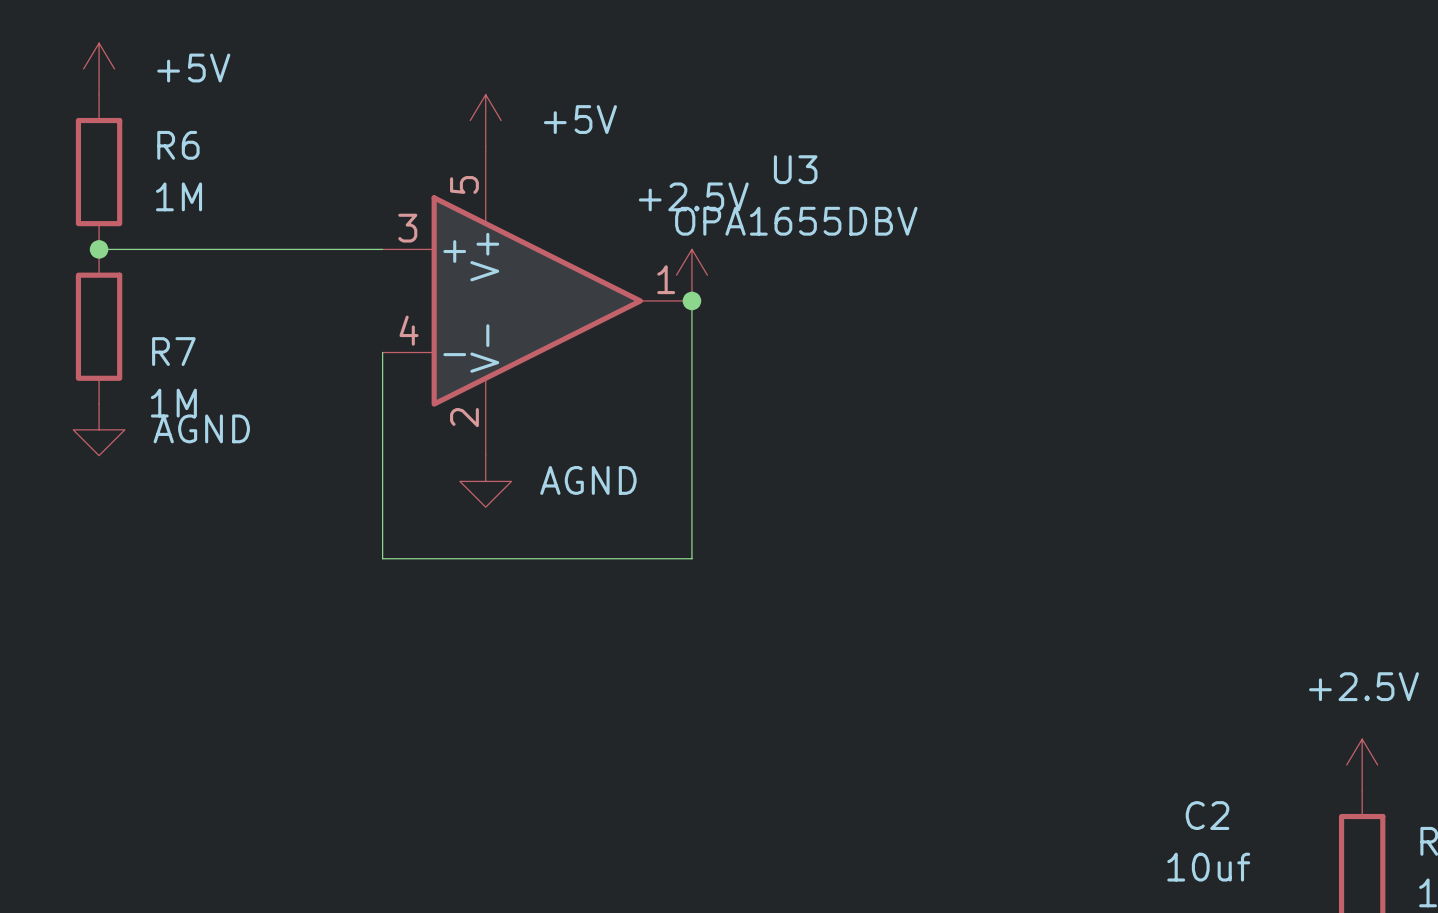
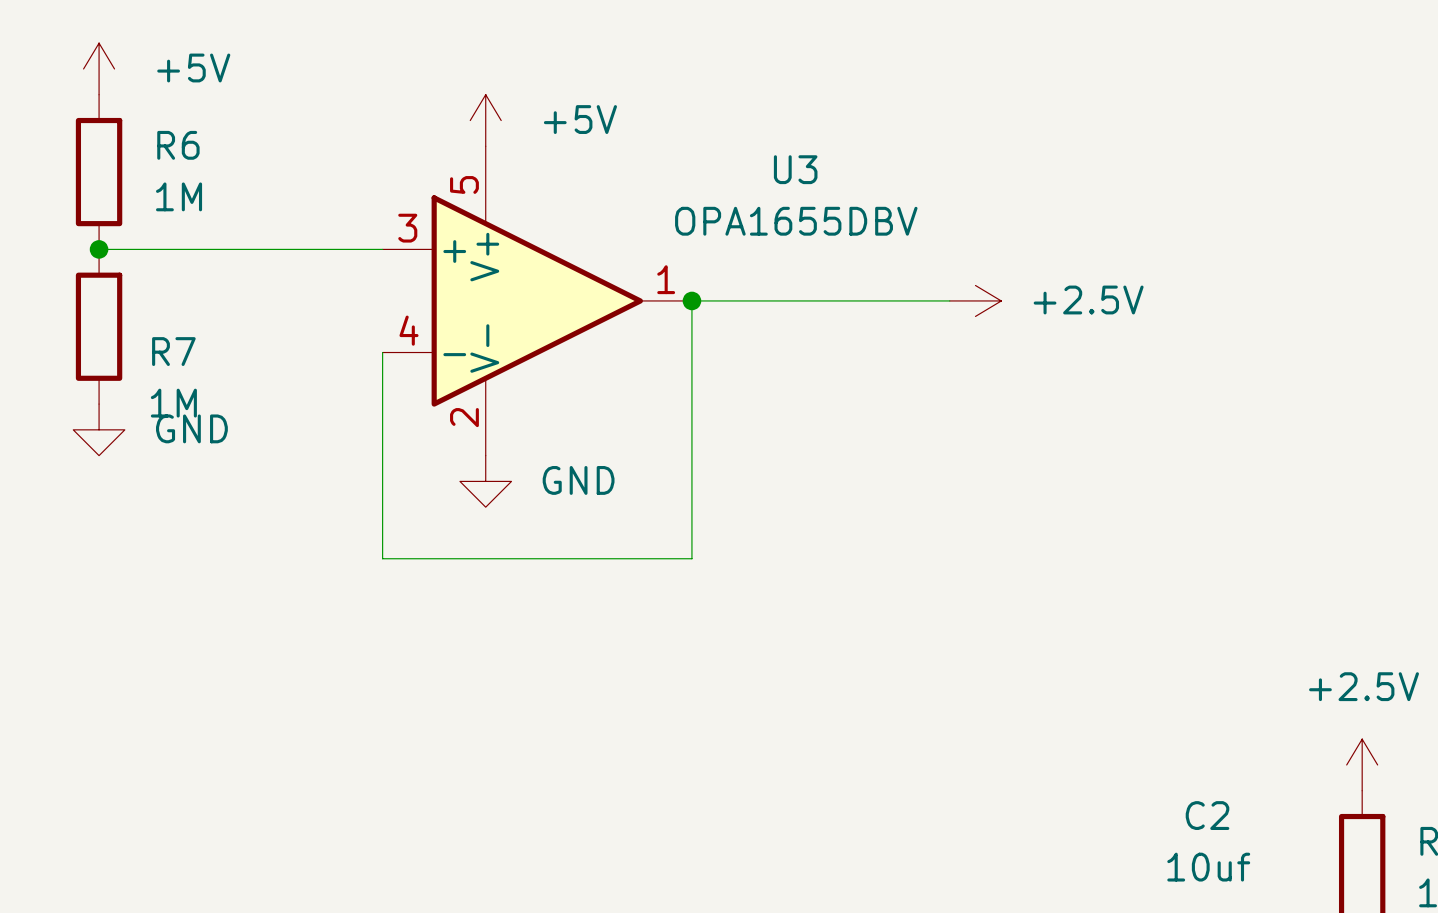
power symbol text position: +2.5V (693, 196) -> +2.5V (1088, 299)
power symbol rotation: 0° (691, 275) -> 90° clockwise (975, 300)
power symbol position: +2.5V (691, 275) -> +2.5V (975, 300)
wire: none -> (691, 300) (949, 300)
power symbol: AGND (99, 429) -> GND (99, 429)
power symbol: AGND (485, 481) -> GND (485, 481)

